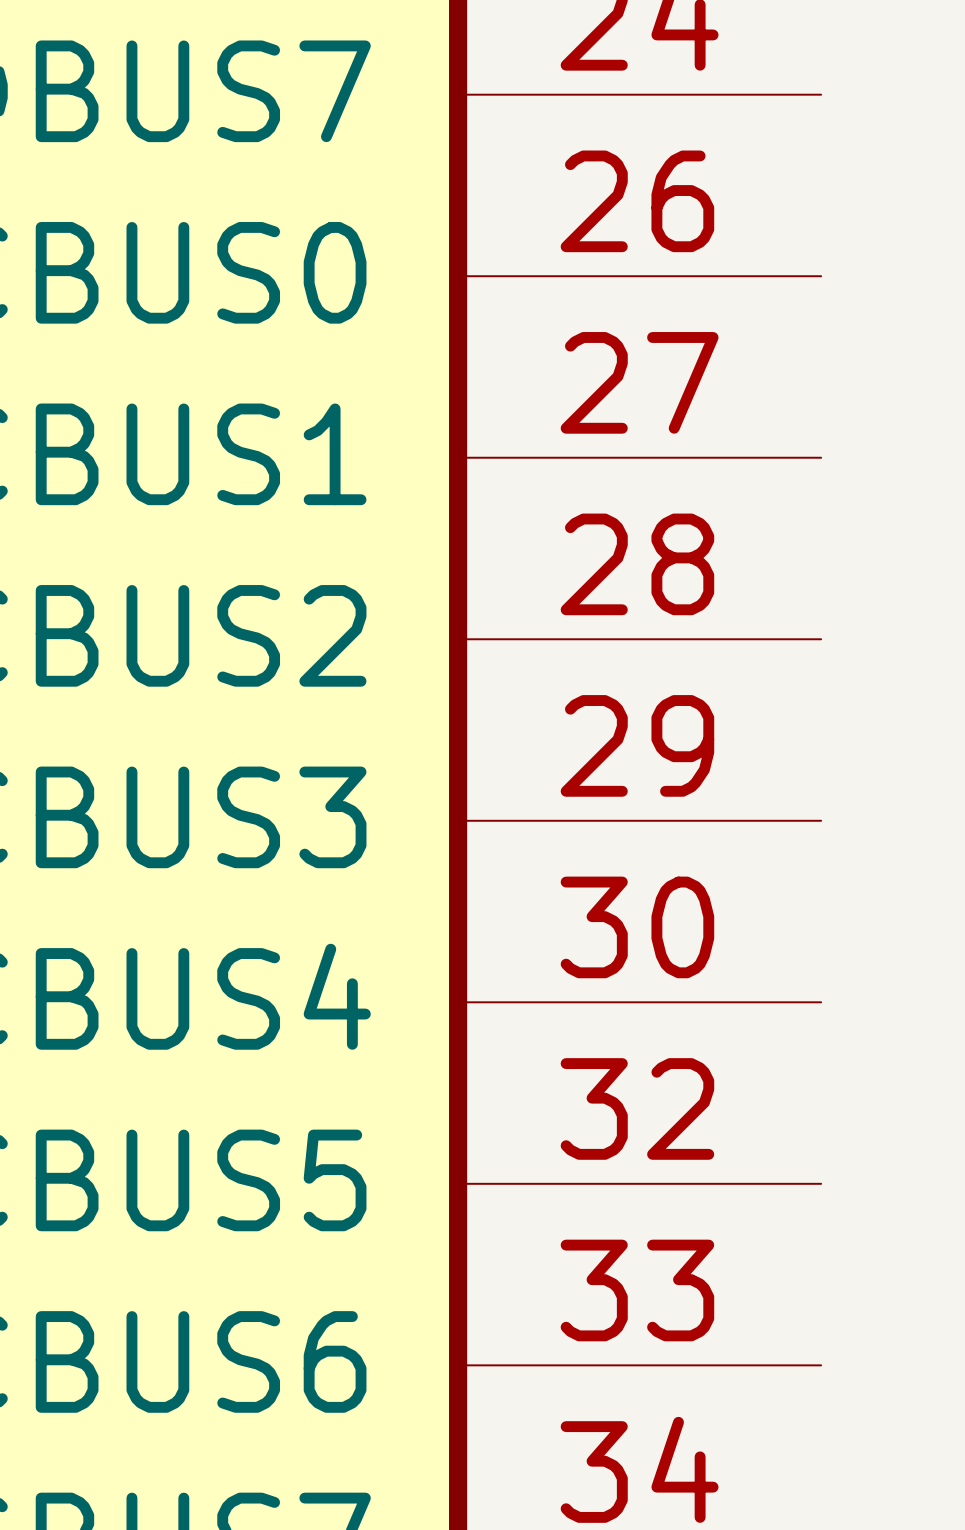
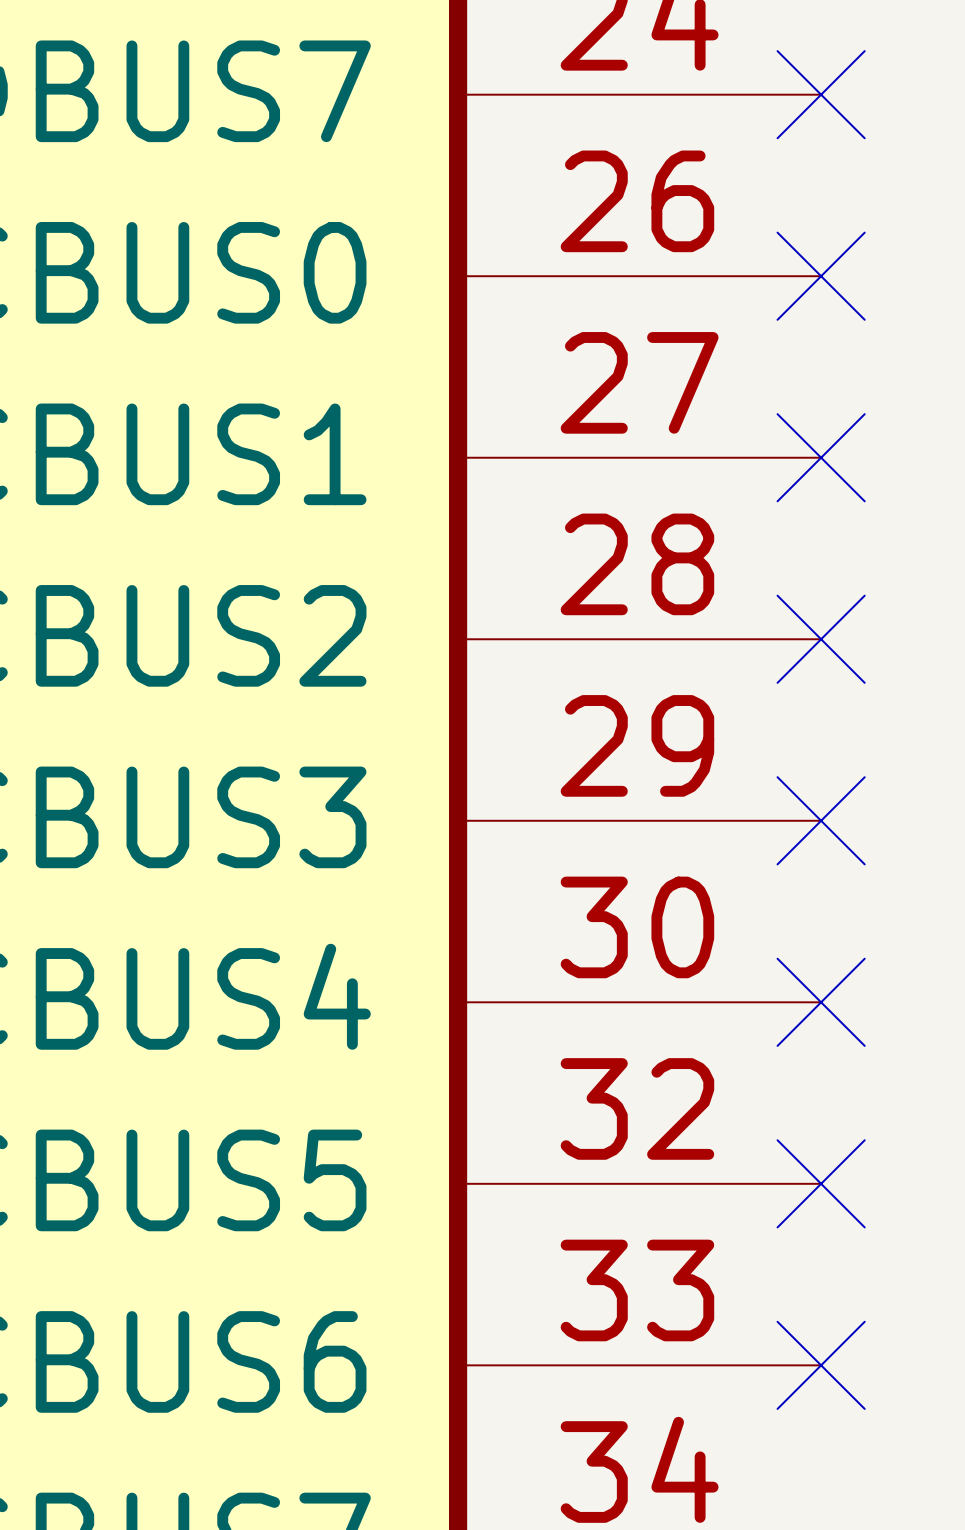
no-connect mark: none -> (821, 94)
no-connect mark: none -> (821, 276)
no-connect mark: none -> (821, 457)
no-connect mark: none -> (821, 639)
no-connect mark: none -> (821, 820)
no-connect mark: none -> (821, 1002)
no-connect mark: none -> (821, 1183)
no-connect mark: none -> (821, 1365)

